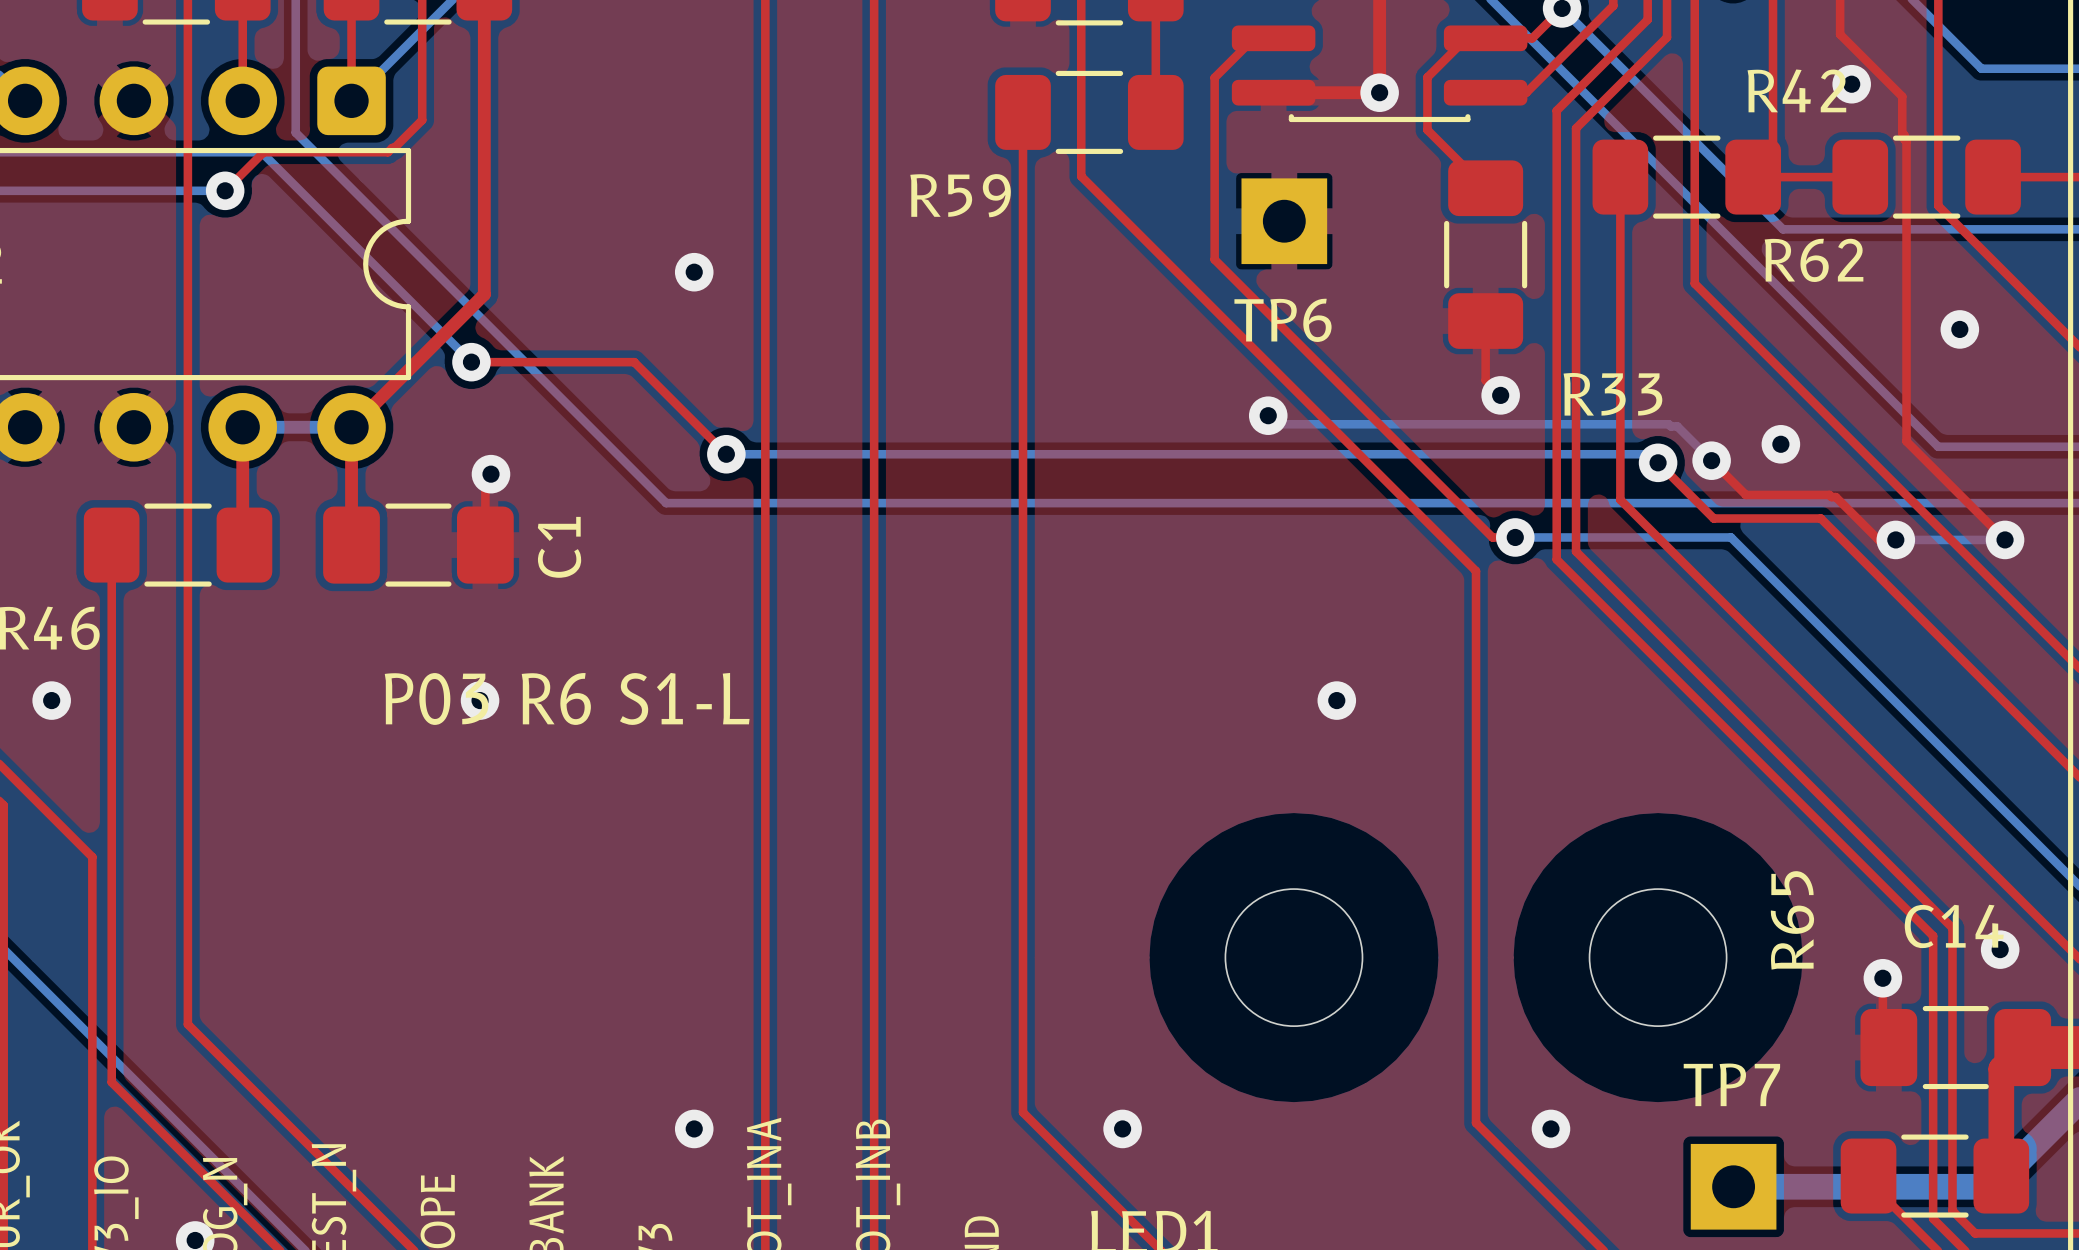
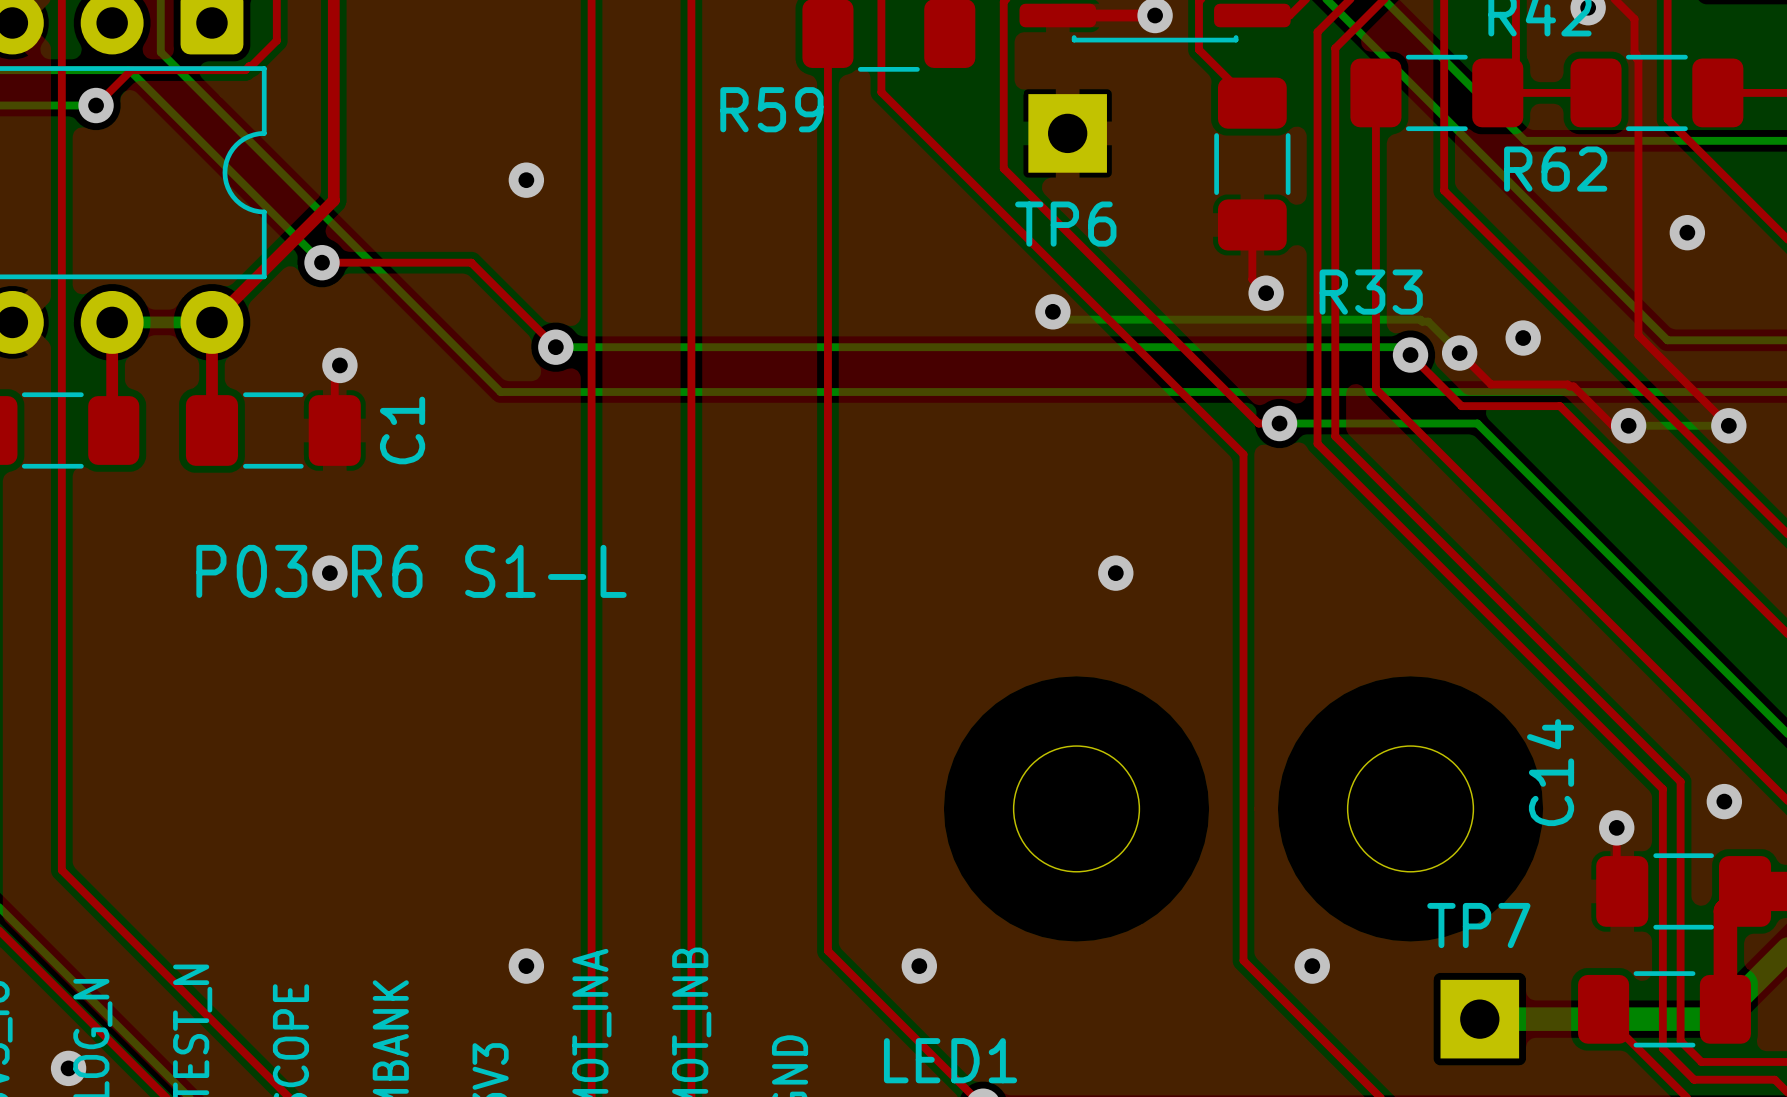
R65 name: R65 (1792, 920) -> none
C14 name rotation: 0° (1954, 926) -> 90° counterclockwise (1550, 772)

